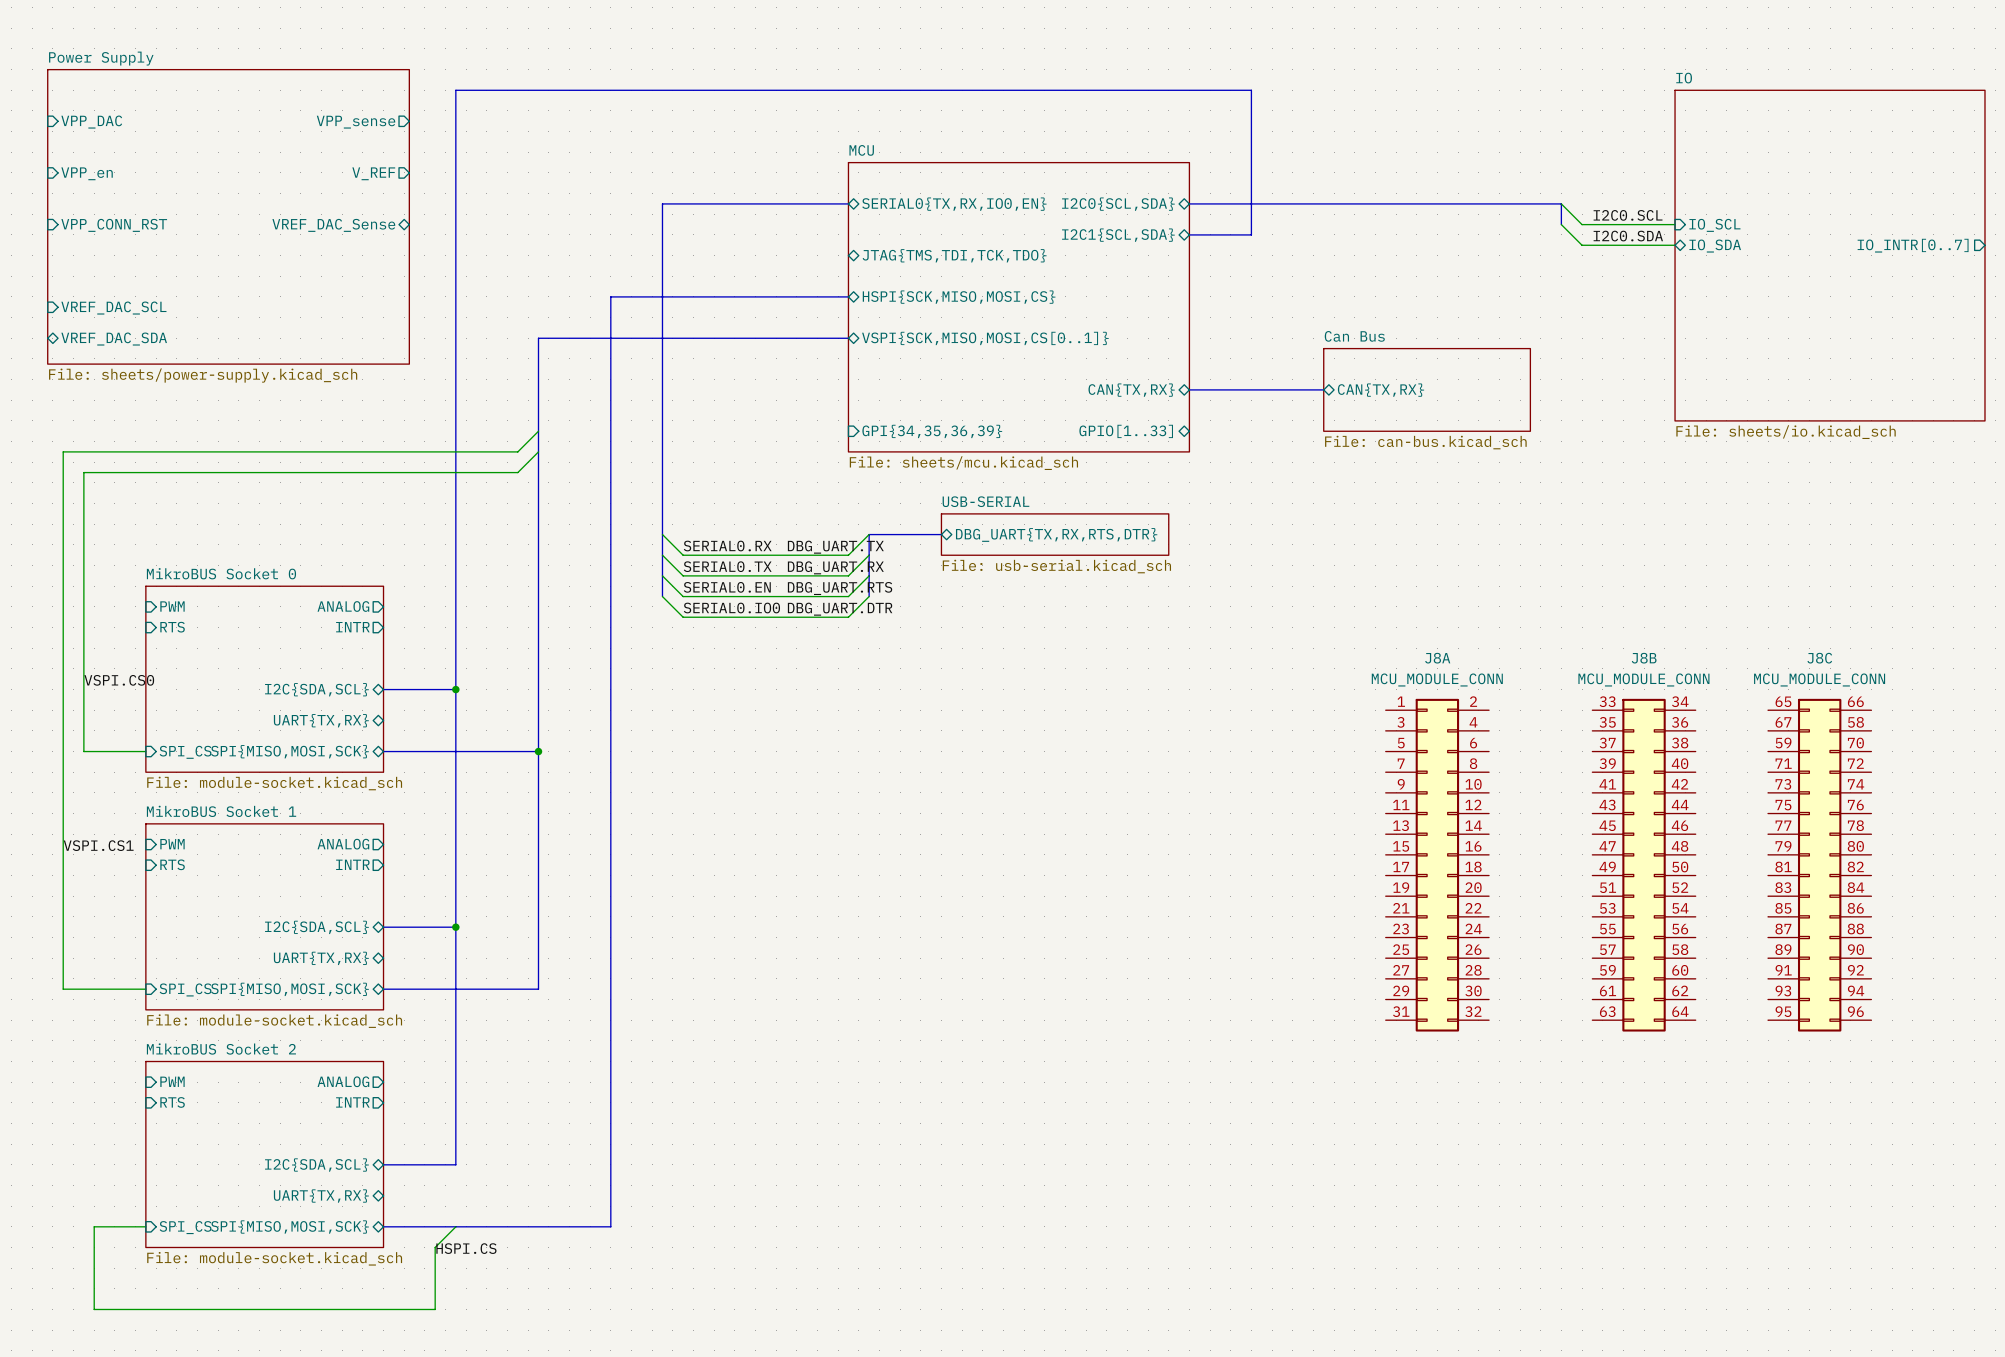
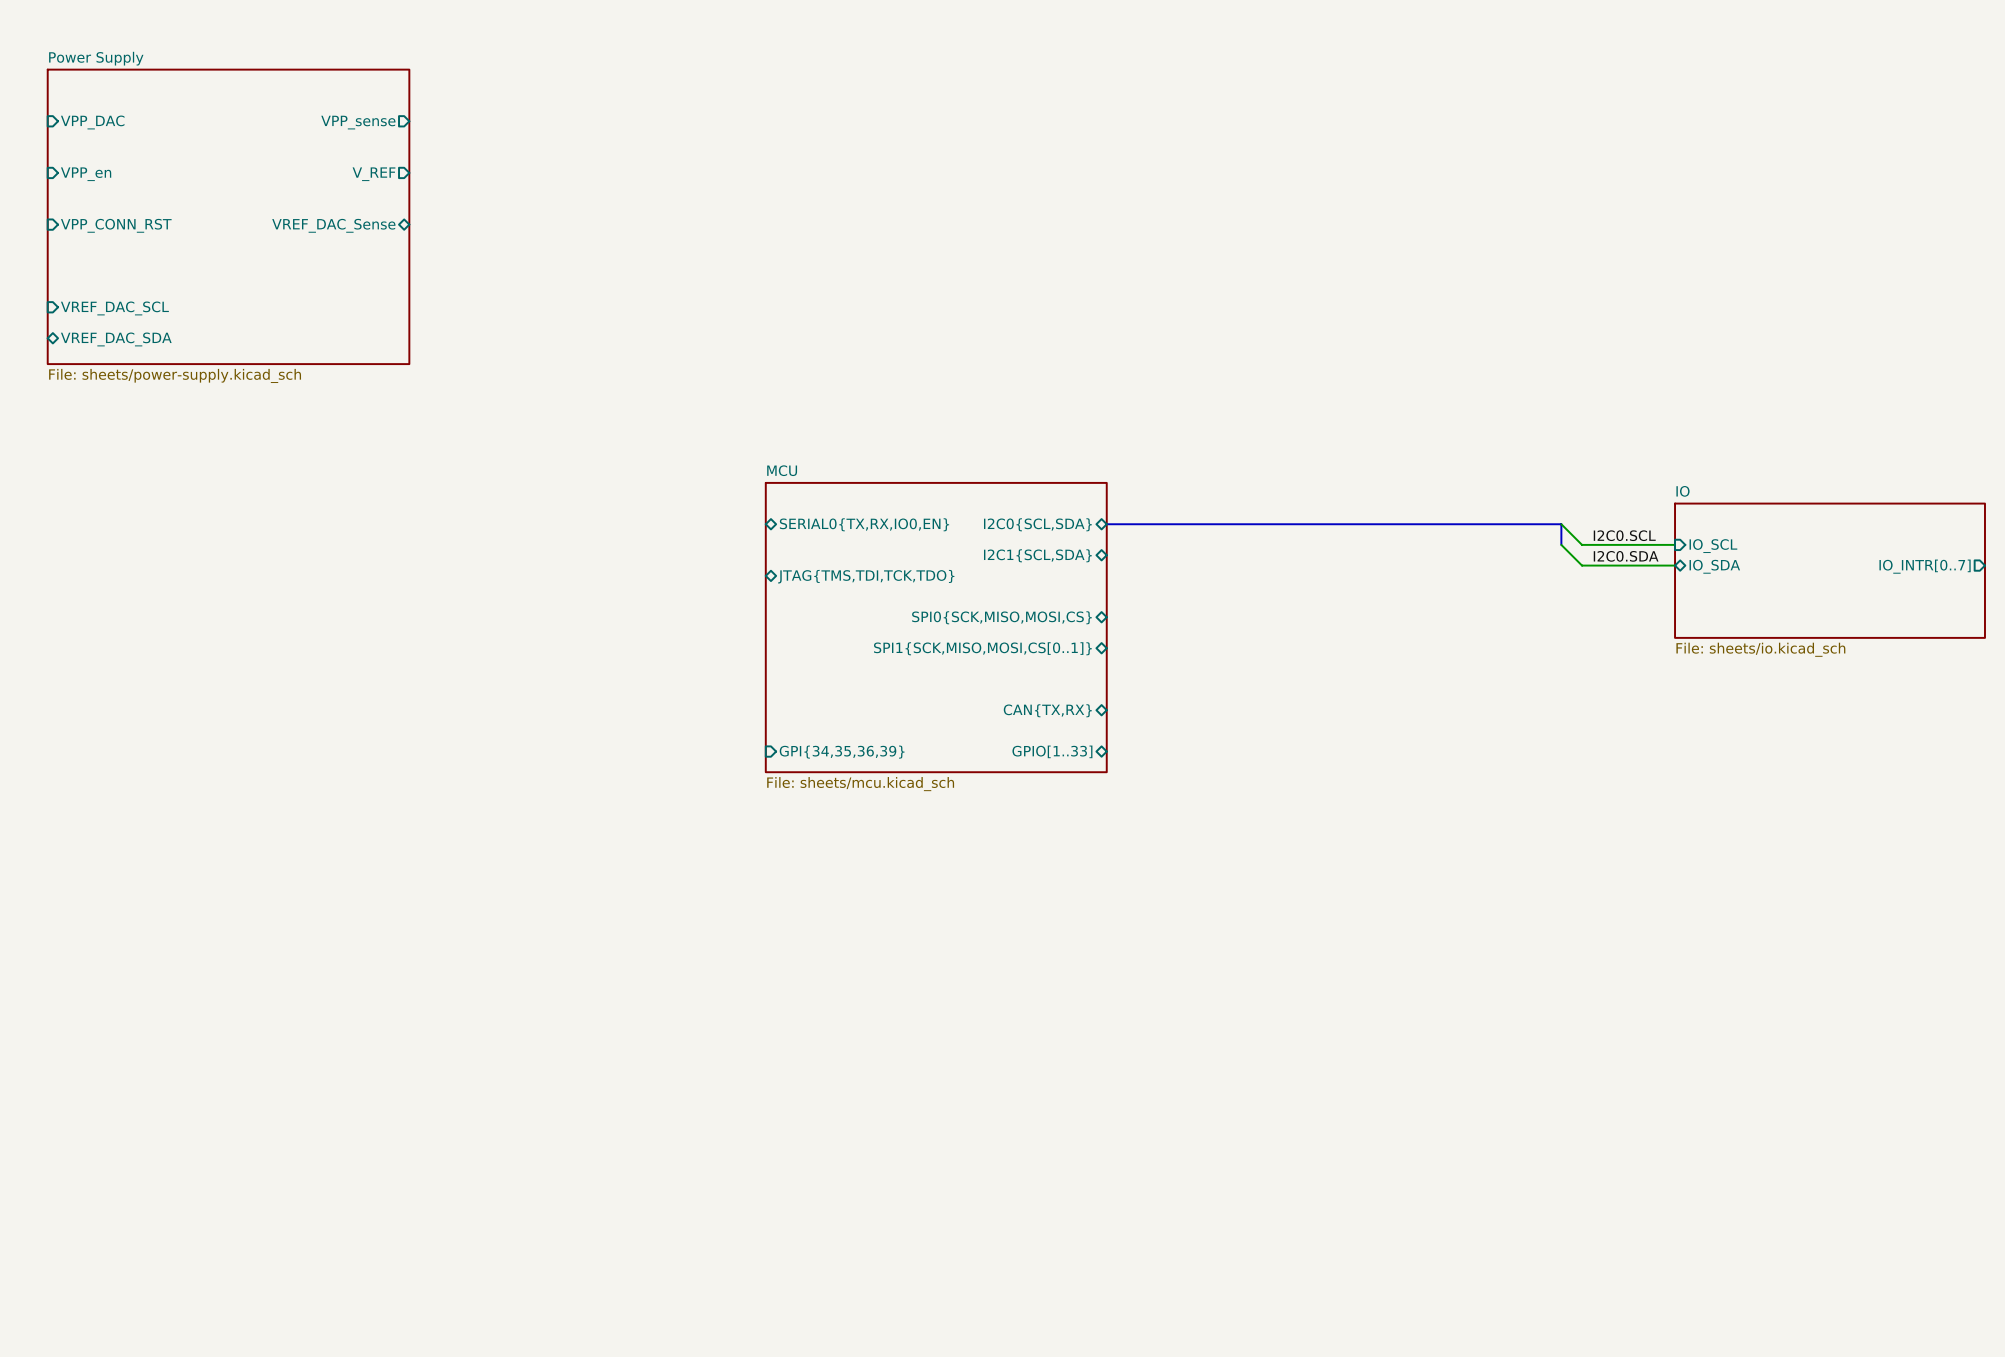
bus: (848, 203) (662, 203) (662, 596) -> none
bus: (1189, 203) (1561, 203) (1561, 224) -> none
wire: (1561, 203) (1582, 224) (1675, 224) -> none
sheet pin: SERIAL0{TX,RX,IO0,EN} (954, 204) -> none
sheet pin: I2C0{SCL,SDA} (1118, 204) -> none
label: I2C0.SCL (1628, 215) -> none
wire: (1561, 224) (1582, 245) (1675, 245) -> none
sheet pin: IO_SCL (1714, 225) -> none
bus: (1189, 234) (1251, 234) (1251, 90) (455, 90) (455, 1164) (383, 1164) -> none
sheet pin: I2C1{SCL,SDA} (1118, 235) -> none
label: I2C0.SDA (1628, 236) -> none
sheet pin: IO_INTR[0..7] (1913, 245) -> none
sheet pin: IO_SDA (1715, 246) -> none
sheet pin: JTAG{TMS,TDI,TCK,TDO} (954, 255) -> none
sheet IO: File: sheets/io.kicad_sch (1830, 255) -> none
bus: (848, 296) (610, 296) (610, 1226) (383, 1226) -> none
sheet pin: HSPI{SCK,MISO,MOSI,CS} (959, 297) -> none
sheet MCU: File: sheets/mcu.kicad_sch (1018, 307) -> none
bus: (848, 338) (538, 338) (538, 989) (383, 989) -> none
sheet pin: VSPI{SCK,MISO,MOSI,CS[0..1]} (985, 338) -> none
bus: (1189, 389) (1323, 389) -> none
sheet Can Bus: File: can-bus.kicad_sch (1427, 389) -> none
sheet pin: CAN{TX,RX} (1131, 390) -> none
sheet pin: CAN{TX,RX} (1381, 390) -> none
wire: (538, 431) (517, 451) (63, 451) (63, 989) (145, 989) -> none
sheet pin: GPI{34,35,36,39} (932, 431) -> none
sheet pin: GPIO[1..33] (1126, 431) -> none
wire: (538, 451) (517, 472) (83, 472) (83, 751) (145, 751) -> none
sheet pin: none -> SERIAL0{TX,RX,IO0,EN} (864, 524)
sheet pin: none -> I2C0{SCL,SDA} (1037, 524)
bus: none -> (1106, 524) (1561, 524) (1561, 544)
wire: none -> (1561, 524) (1582, 544) (1675, 544)
wire: (662, 534) (683, 555) (848, 555) (869, 534) -> none
bus: (941, 534) (869, 534) (869, 596) -> none
sheet USB-SERIAL: File: usb-serial.kicad_sch (1055, 534) -> none
sheet pin: DBG_UART{TX,RX,RTS,DTR} (1056, 534) -> none
label: none -> I2C0.SCL (1624, 535)
wire: none -> (1561, 544) (1582, 565) (1675, 565)
sheet pin: none -> IO_SCL (1713, 546)
label: SERIAL0.RX (727, 546) -> none
label: DBG_UART.TX (835, 547) -> none
wire: (662, 555) (683, 575) (848, 575) (869, 555) -> none
sheet pin: none -> I2C1{SCL,SDA} (1037, 555)
label: none -> I2C0.SDA (1626, 556)
sheet pin: none -> IO_INTR[0..7] (1925, 566)
label: SERIAL0.TX (727, 566) -> none
sheet pin: none -> IO_SDA (1714, 566)
label: DBG_UART.RX (835, 567) -> none
sheet IO: none -> File: sheets/io.kicad_sch (1830, 570)
wire: (662, 575) (683, 596) (848, 596) (869, 575) -> none
sheet pin: none -> JTAG{TMS,TDI,TCK,TDO} (866, 576)
label: SERIAL0.EN (727, 587) -> none
label: DBG_UART.RTS (840, 588) -> none
wire: (662, 596) (683, 617) (848, 617) (869, 596) -> none
sheet pin: PWM (172, 606) -> none
sheet pin: ANALOG (343, 606) -> none
label: SERIAL0.IO0 (731, 608) -> none
label: DBG_UART.DTR (840, 609) -> none
sheet pin: none -> SPI0{SCK,MISO,MOSI,CS} (1001, 617)
sheet pin: RTS (172, 627) -> none
sheet pin: INTR (352, 627) -> none
sheet MCU: none -> File: sheets/mcu.kicad_sch (936, 627)
sheet pin: none -> SPI1{SCK,MISO,MOSI,CS[0..1]} (982, 648)
sheet MikroBUS Socket 0: File: module-socket.kicad_sch (264, 679) -> none
label: VSPI.CS0 (119, 680) -> none
sheet pin: I2C{SDA,SCL} (316, 689) -> none
bus: (383, 689) (455, 689) -> none
junction: (455, 689) -> none
sheet pin: none -> CAN{TX,RX} (1047, 710)
sheet pin: UART{TX,RX} (321, 720) -> none
sheet pin: SPI{MISO,MOSI,SCK} (290, 751) -> none
bus: (383, 751) (538, 751) -> none
junction: (538, 751) -> none
sheet pin: none -> GPI{34,35,36,39} (842, 752)
sheet pin: none -> GPIO[1..33] (1052, 751)
sheet pin: SPI_CS (185, 752) -> none
sheet pin: PWM (172, 844) -> none
sheet pin: ANALOG (343, 844) -> none
label: VSPI.CS1 (98, 845) -> none
sheet pin: RTS (172, 864) -> none
sheet pin: INTR (352, 864) -> none
J8A: MCU_MODULE_CONN (1437, 865) -> none
J8B: MCU_MODULE_CONN (1644, 865) -> none
J8C: MCU_MODULE_CONN (1819, 865) -> none
sheet MikroBUS Socket 1: File: module-socket.kicad_sch (264, 916) -> none
sheet pin: I2C{SDA,SCL} (316, 927) -> none
bus: (383, 927) (455, 927) -> none
junction: (455, 927) -> none
sheet pin: UART{TX,RX} (321, 958) -> none
sheet pin: SPI_CS (185, 989) -> none
sheet pin: SPI{MISO,MOSI,SCK} (290, 989) -> none
sheet pin: PWM (172, 1081) -> none
sheet pin: ANALOG (343, 1081) -> none
sheet pin: RTS (172, 1102) -> none
sheet pin: INTR (352, 1102) -> none
sheet MikroBUS Socket 2: File: module-socket.kicad_sch (264, 1154) -> none
sheet pin: I2C{SDA,SCL} (316, 1165) -> none
sheet pin: UART{TX,RX} (321, 1196) -> none
wire: (145, 1226) (94, 1226) (94, 1309) (435, 1309) (435, 1247) (455, 1226) -> none
sheet pin: SPI_CS (185, 1227) -> none
sheet pin: SPI{MISO,MOSI,SCK} (290, 1227) -> none
label: HSPI.CS (466, 1248) -> none

